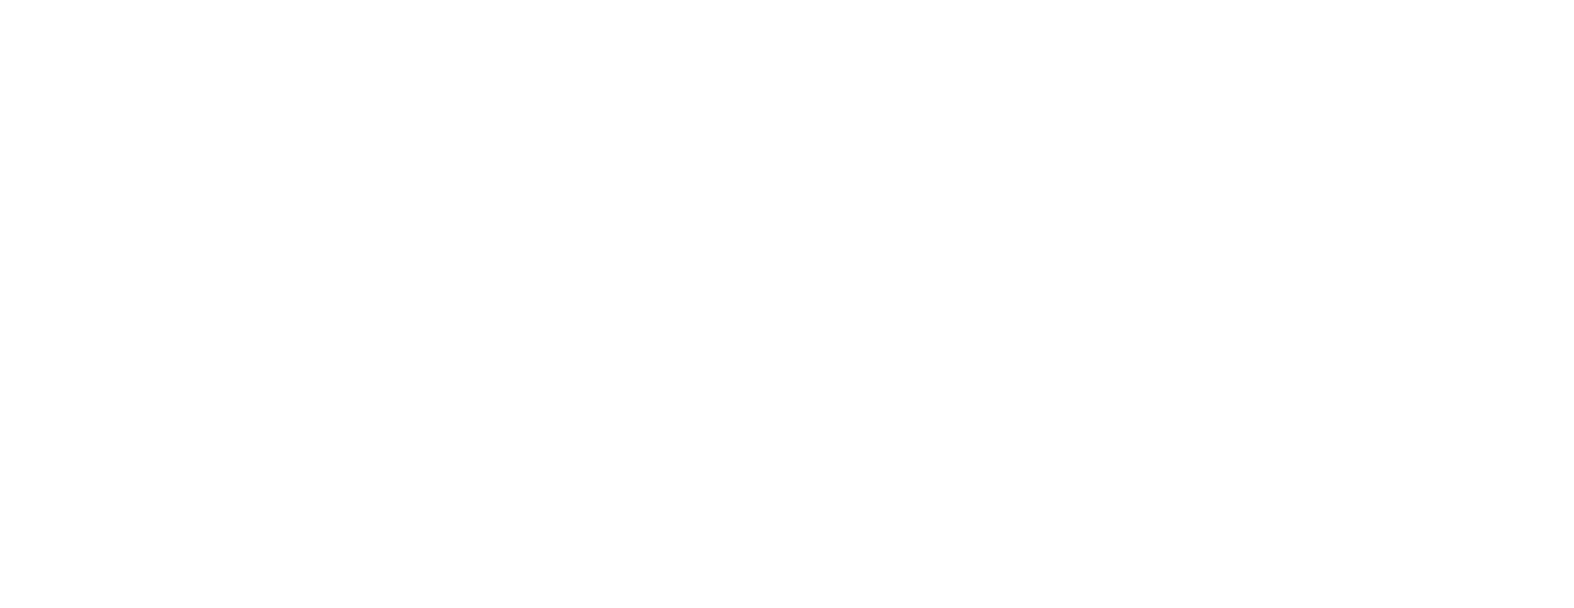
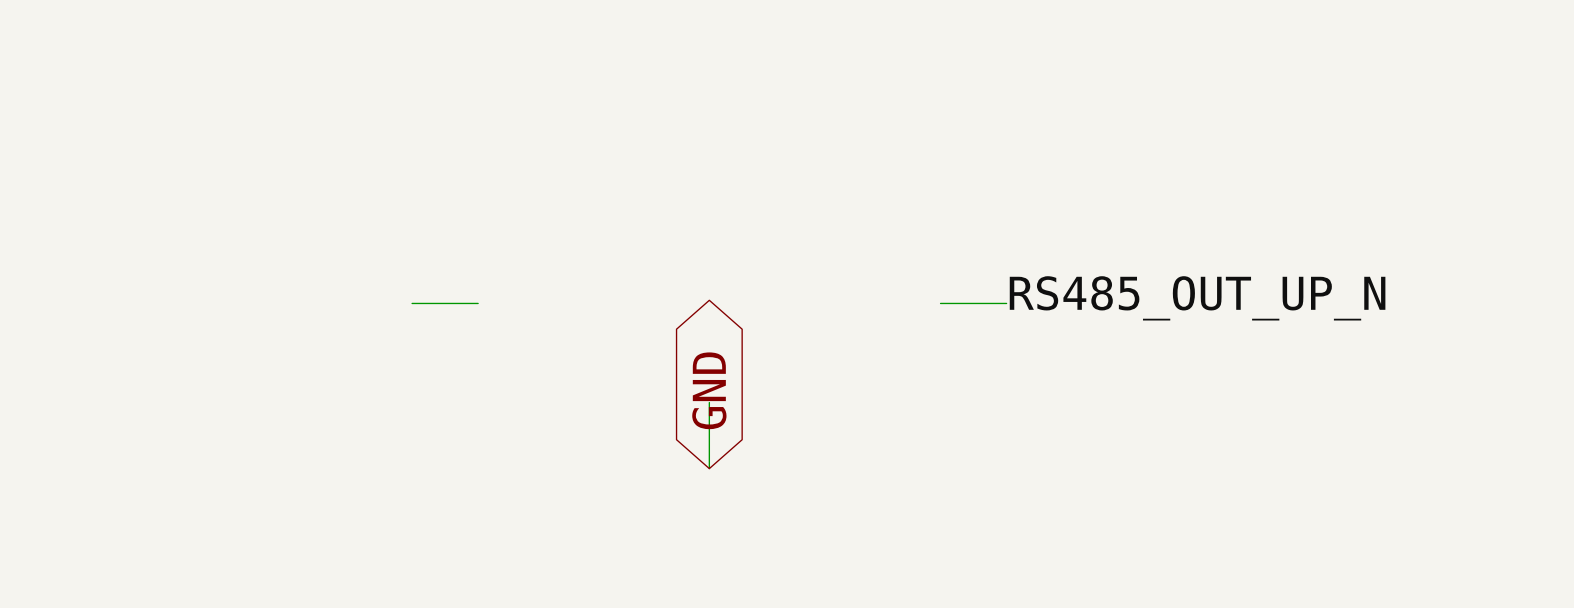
label: none -> RS485_OUT_UP_N (1197, 298)
wire: none -> (412, 303) (478, 303)
wire: none -> (940, 303) (1006, 303)
global label: none -> GND (709, 390)
wire: none -> (709, 402) (709, 468)

